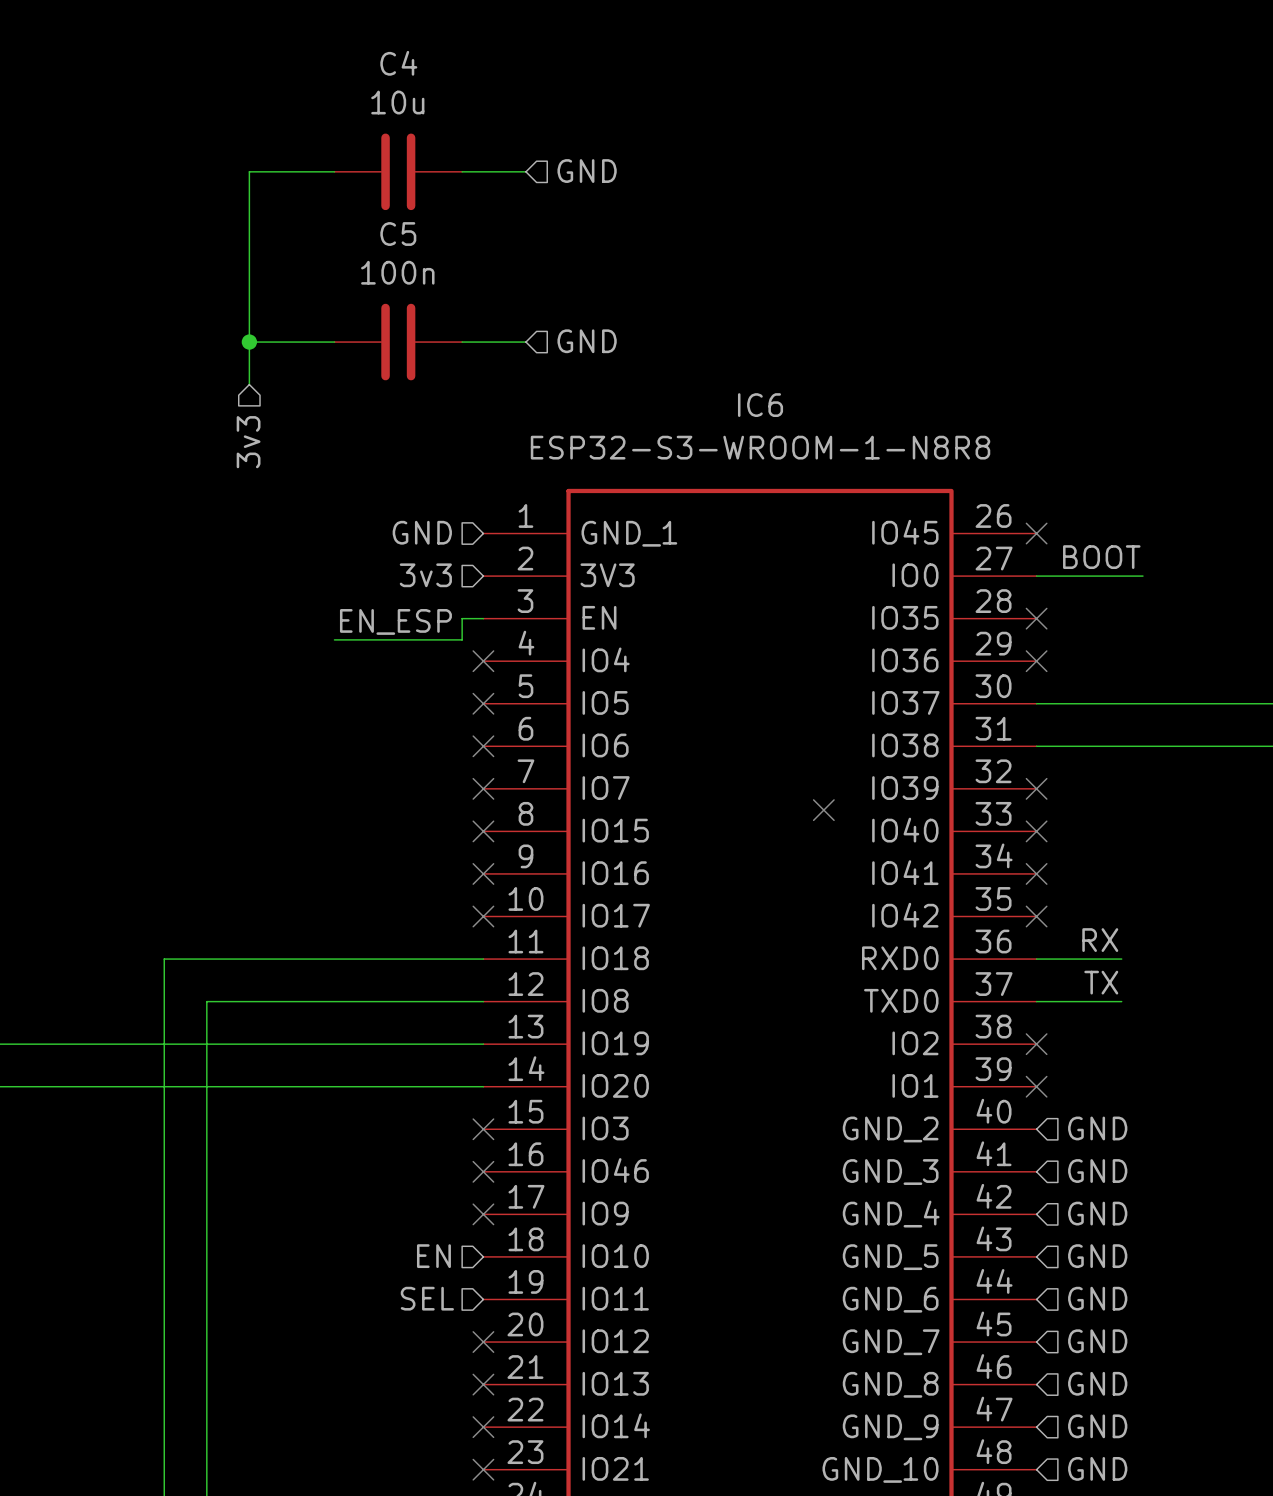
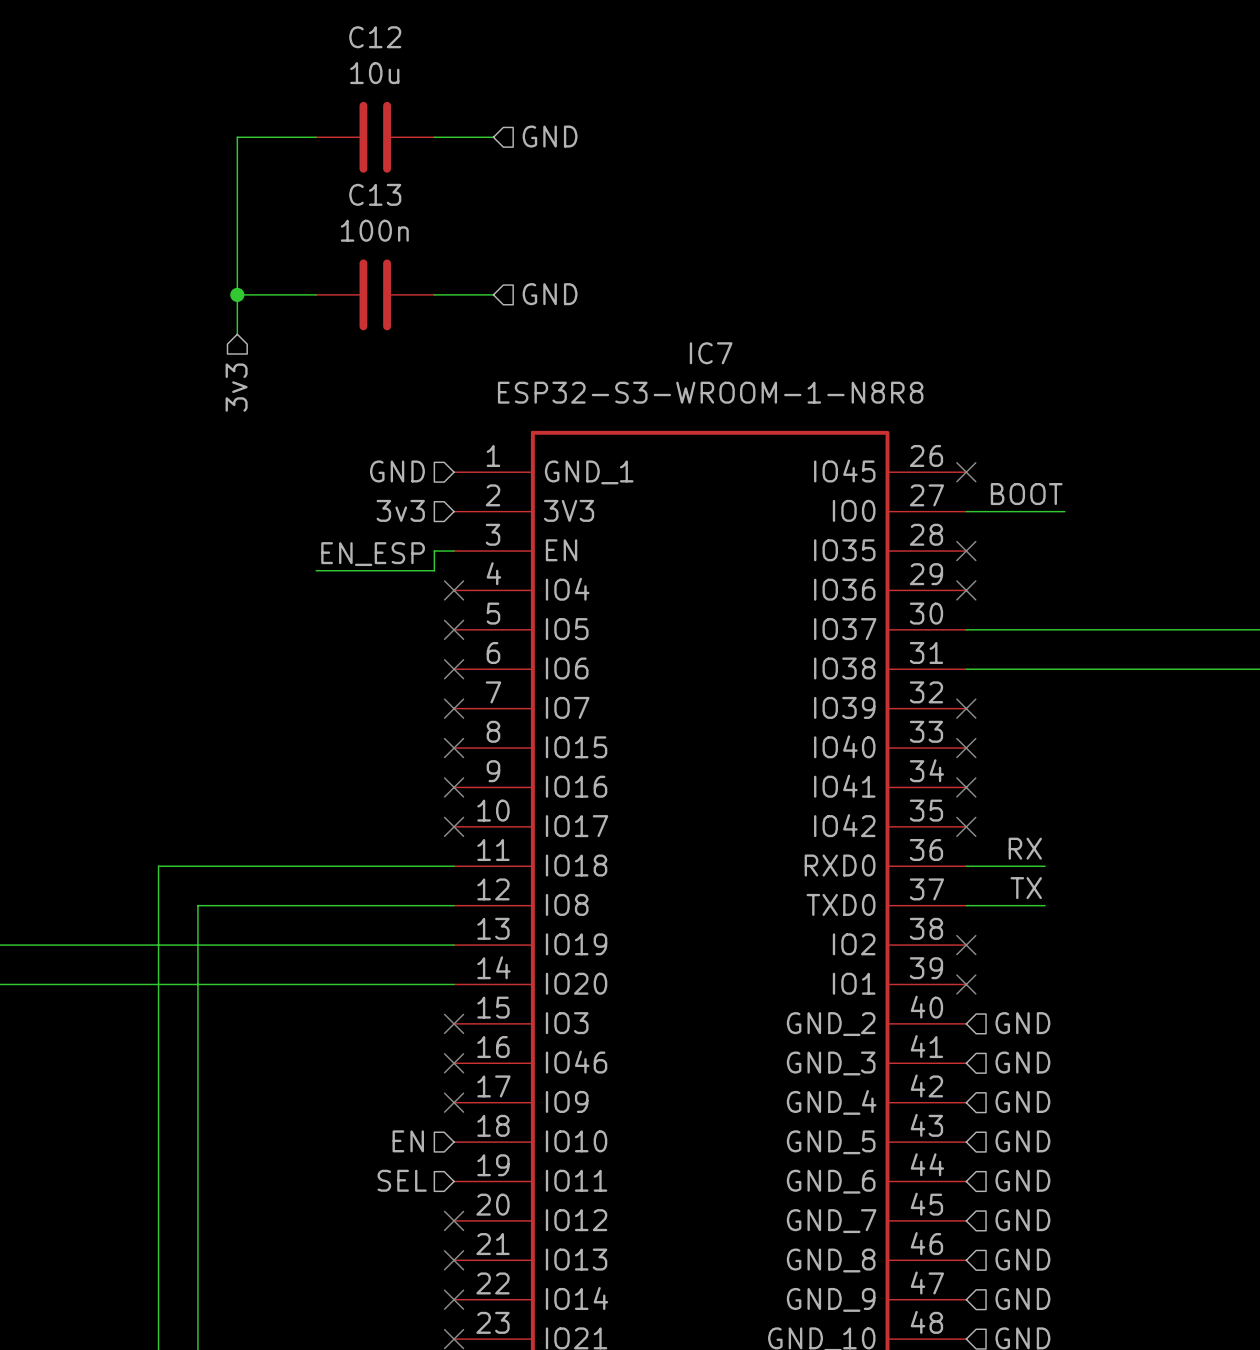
C4 name: C4 (398, 63) -> C12 (375, 37)
C5 name: C5 (398, 234) -> C13 (375, 194)
IC6 name: IC6 (760, 405) -> IC7 (711, 353)
no-connect mark: (823, 810) -> none

